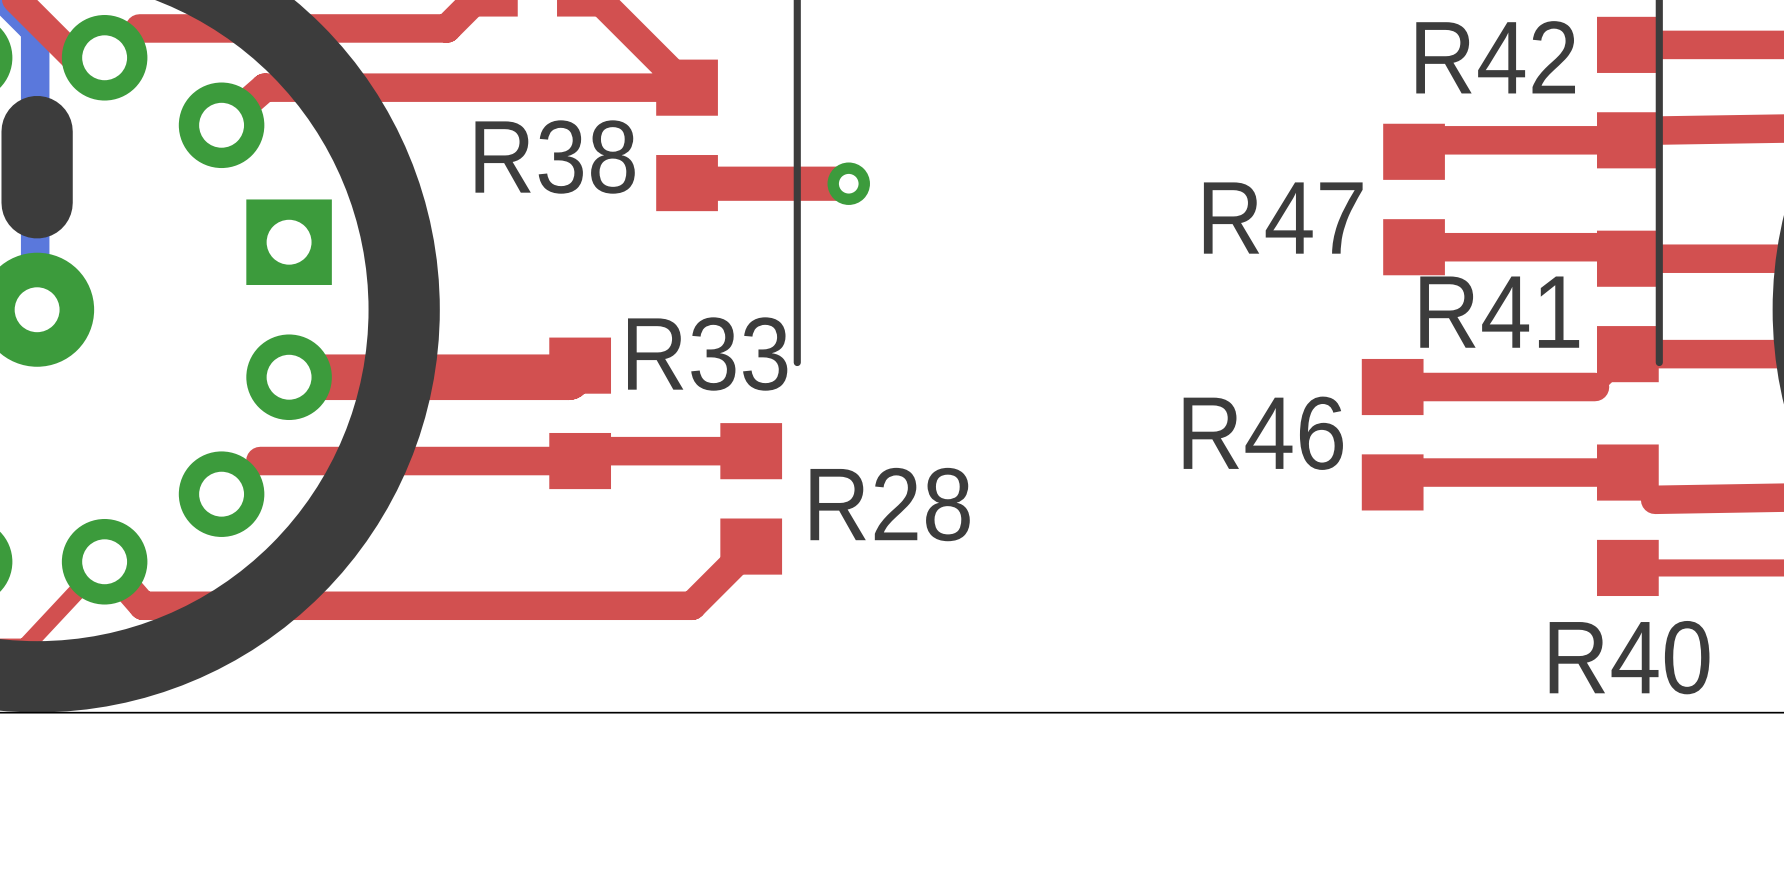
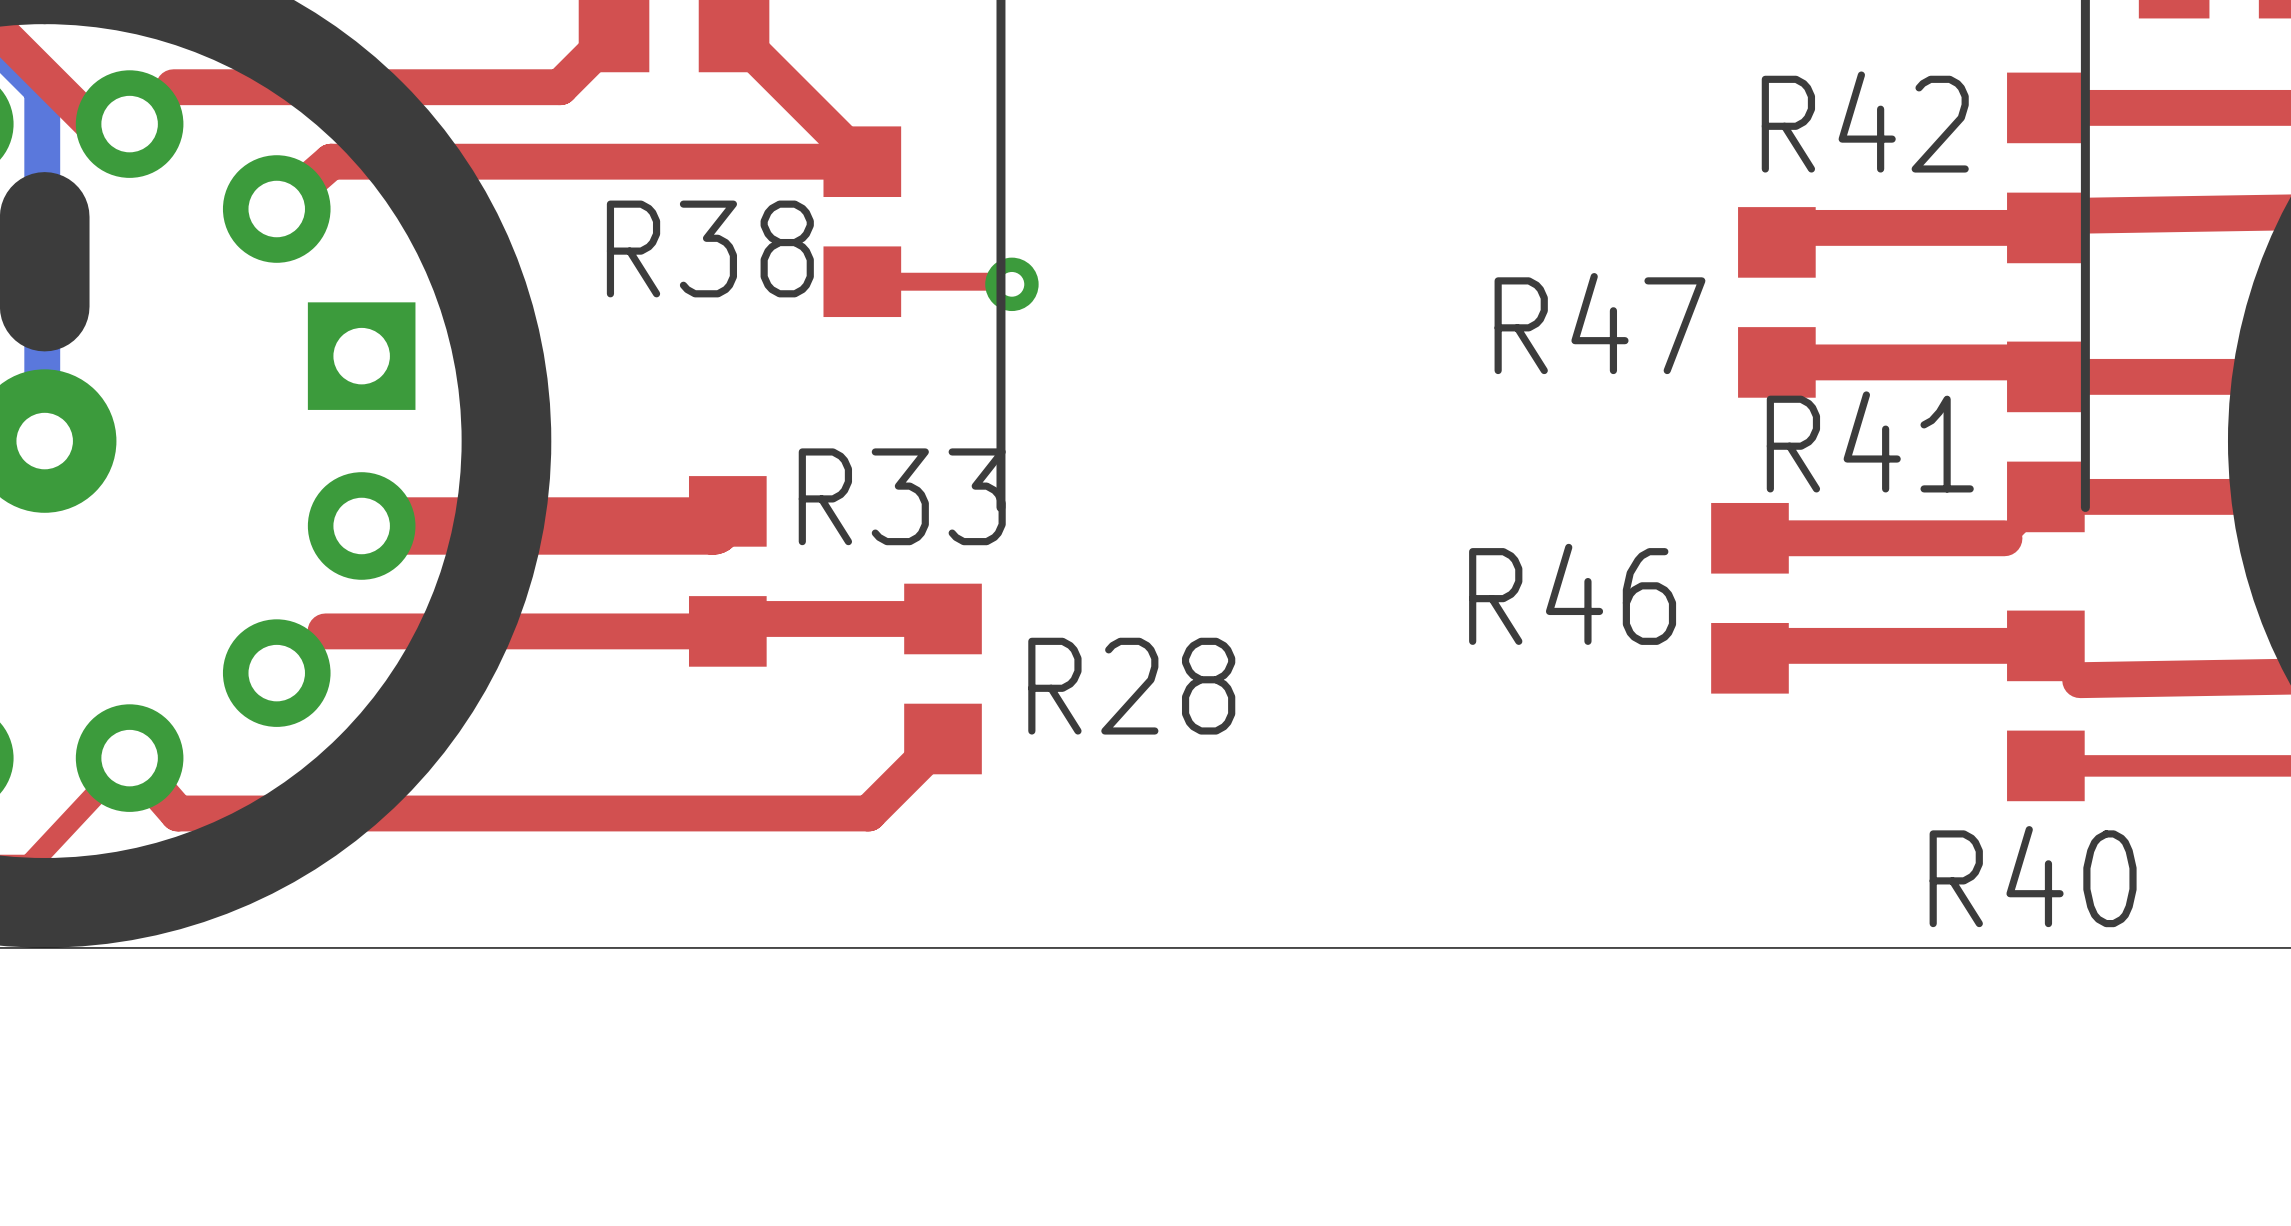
top track: (687, 183) (848, 183) -> (862, 281) (1009, 281) (1011, 284)
via position: (848, 183) -> (1011, 284)

